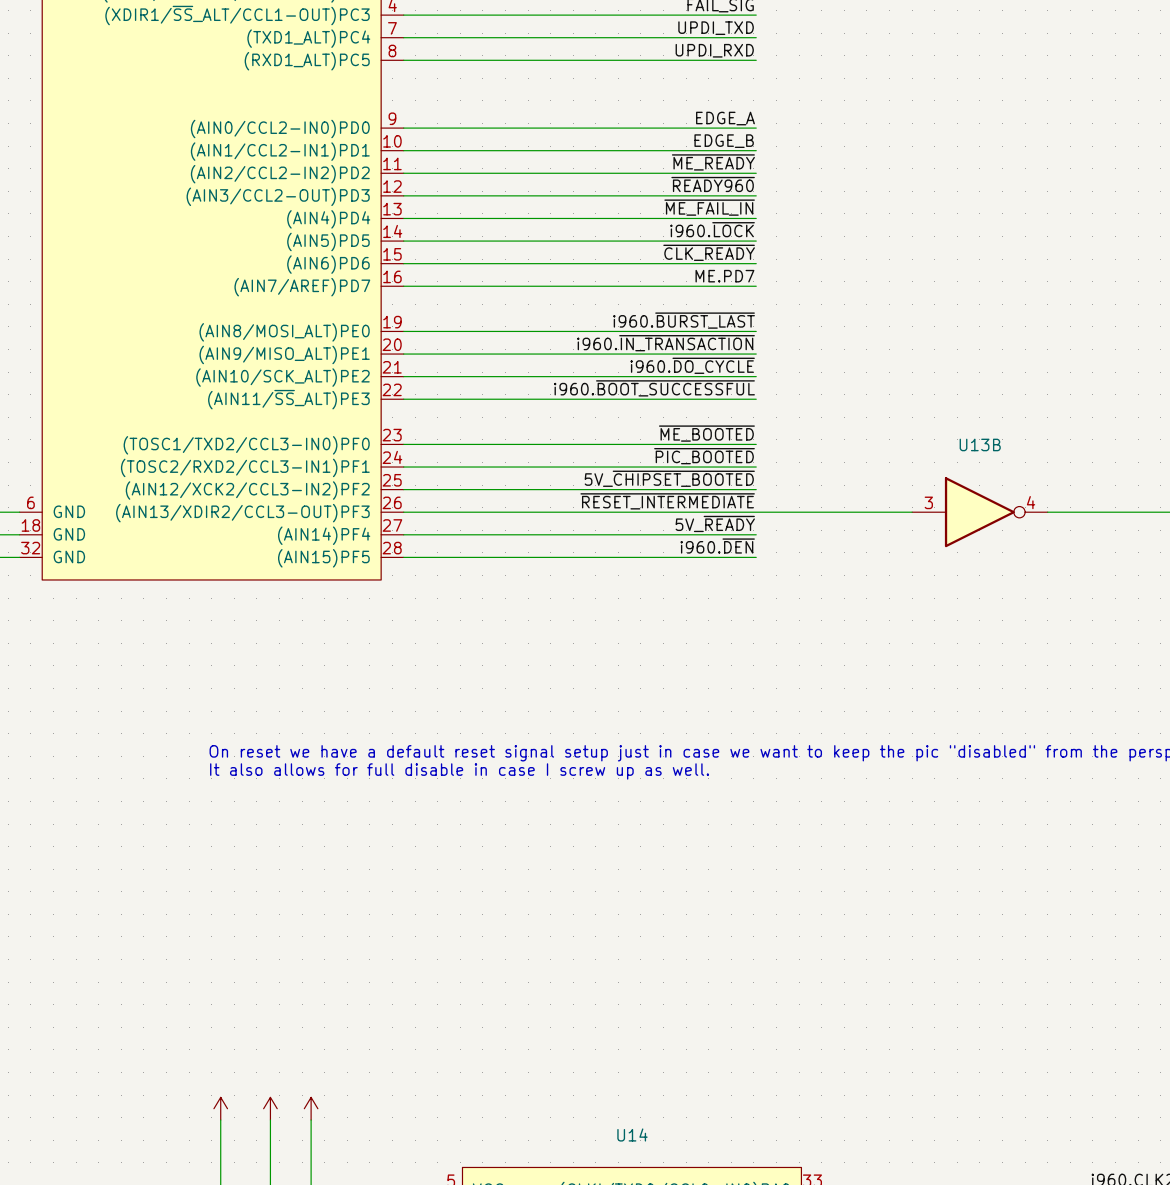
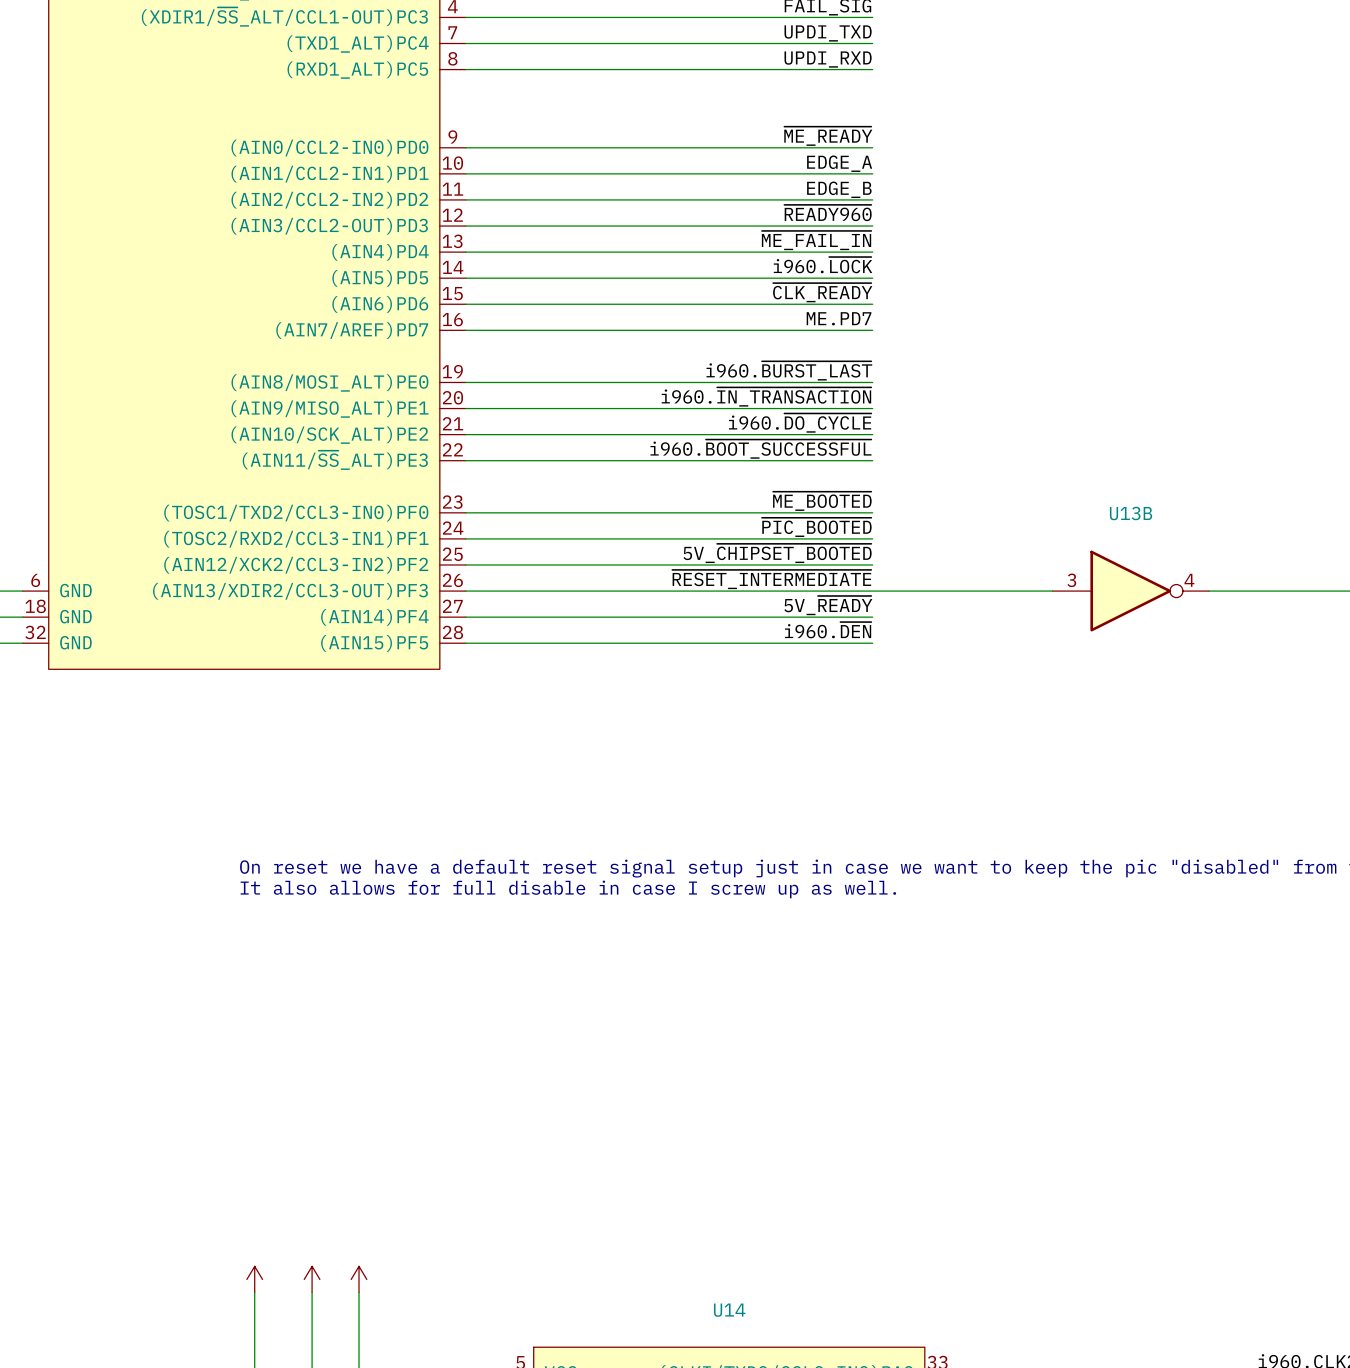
label: EDGE_A (725, 118) -> ~{ME_READY} (828, 136)
label: EDGE_B (724, 141) -> EDGE_A (839, 163)
label: ~{ME_READY} (713, 162) -> EDGE_B (839, 189)

